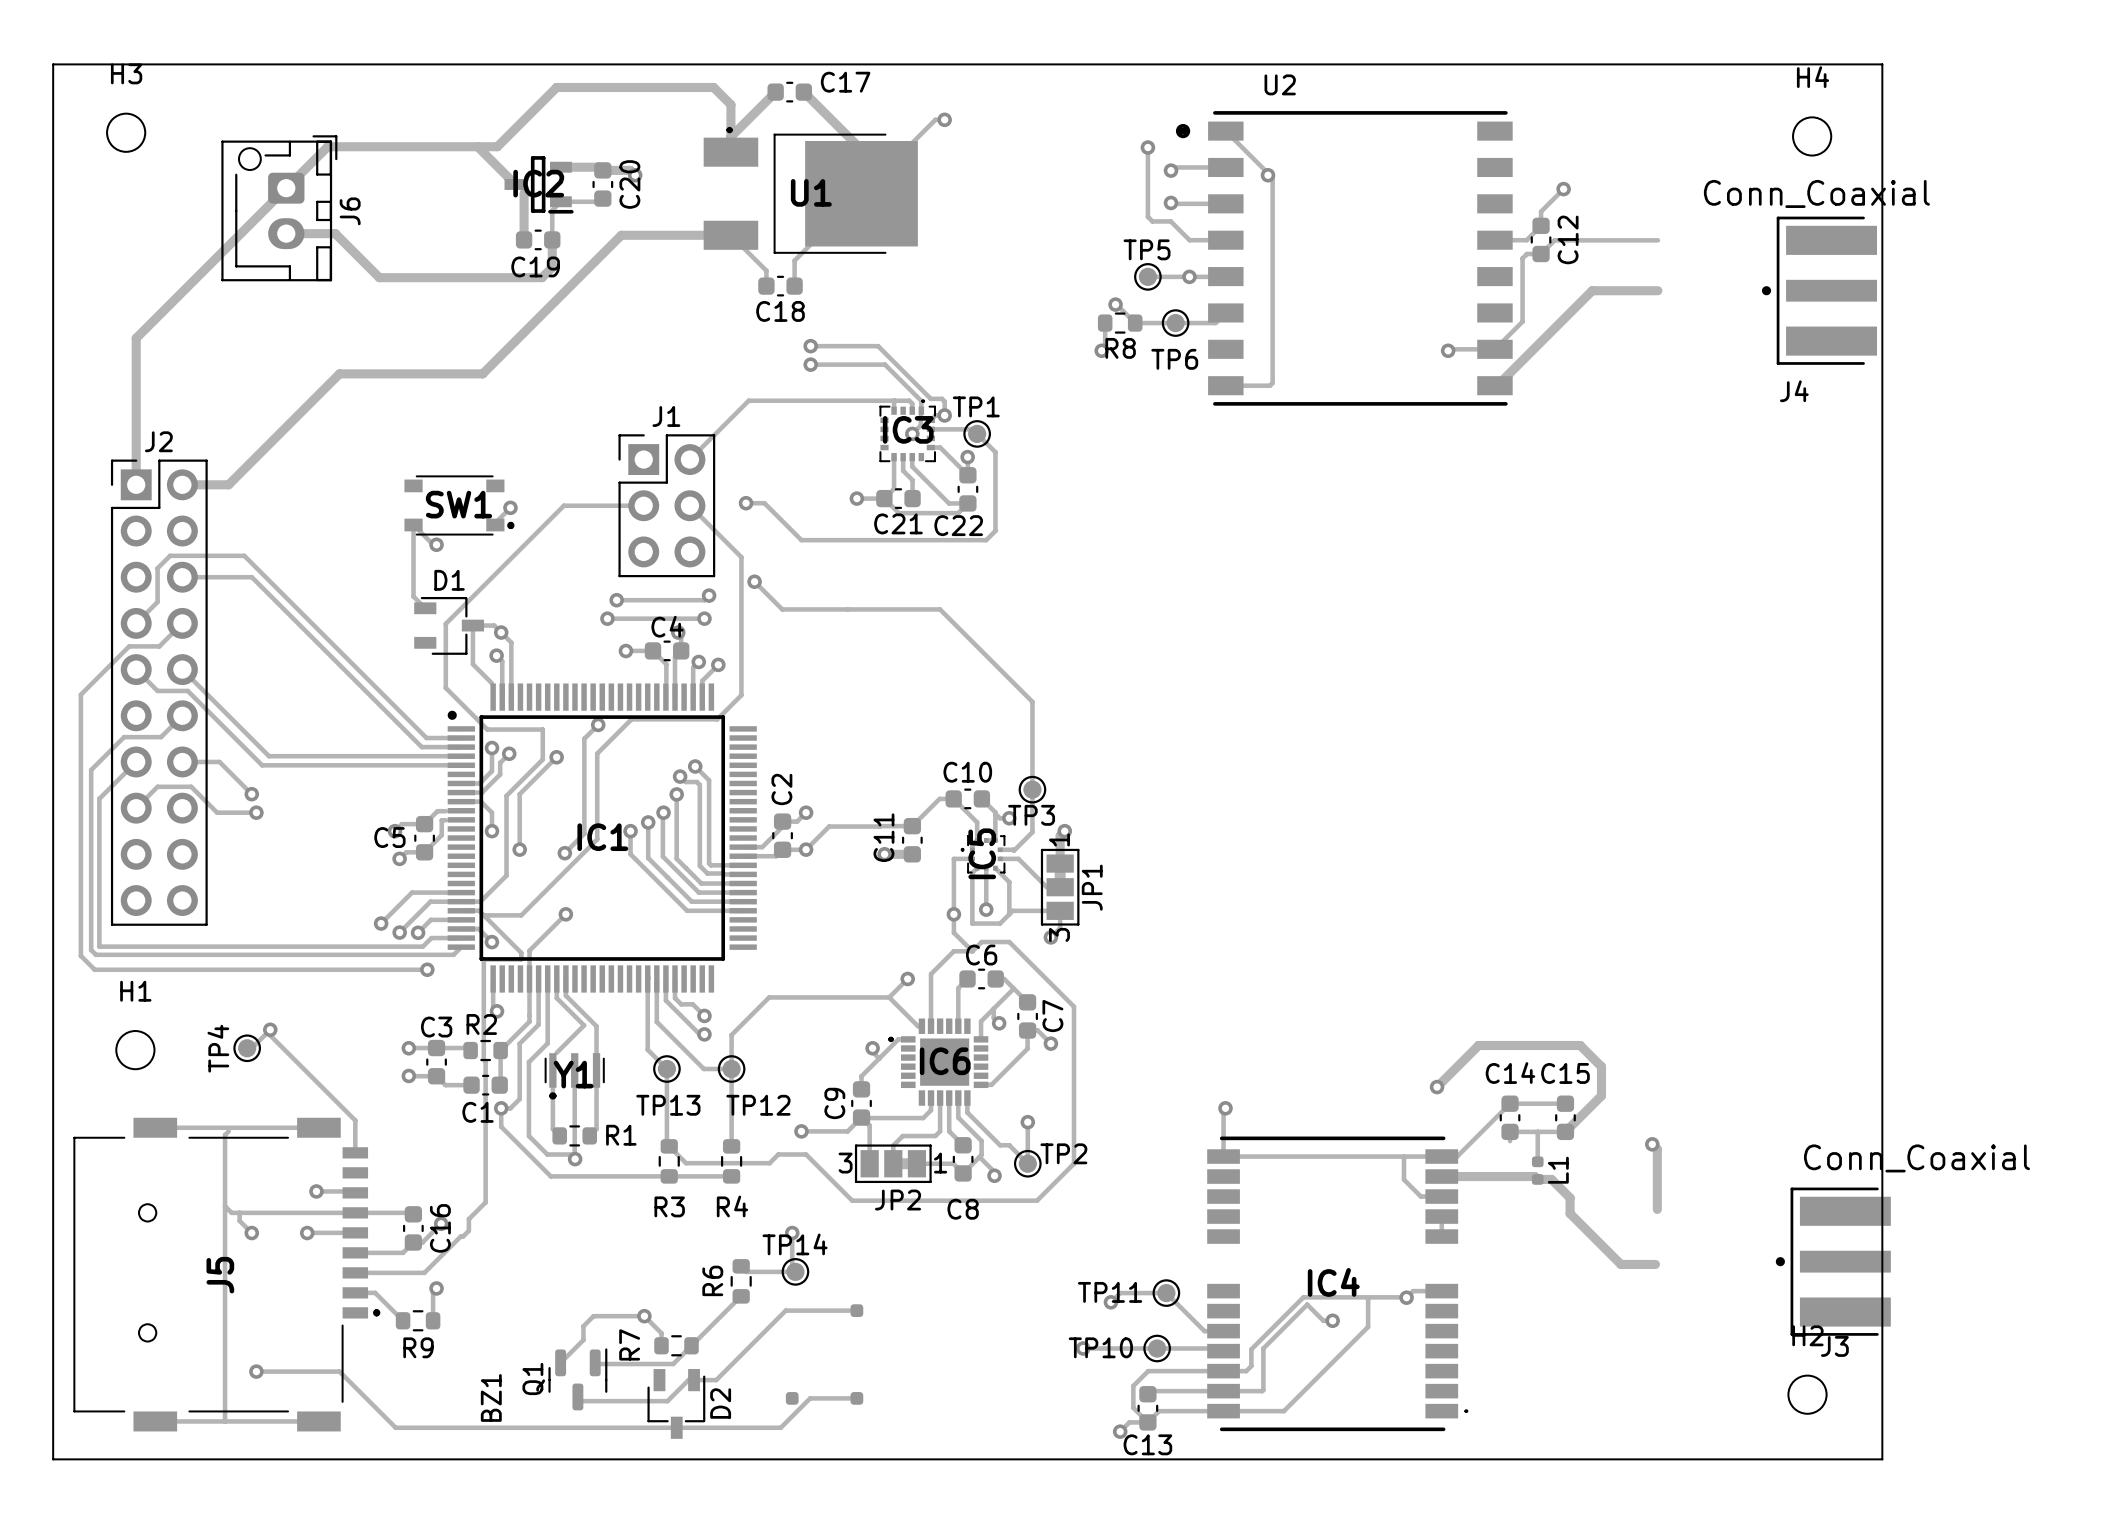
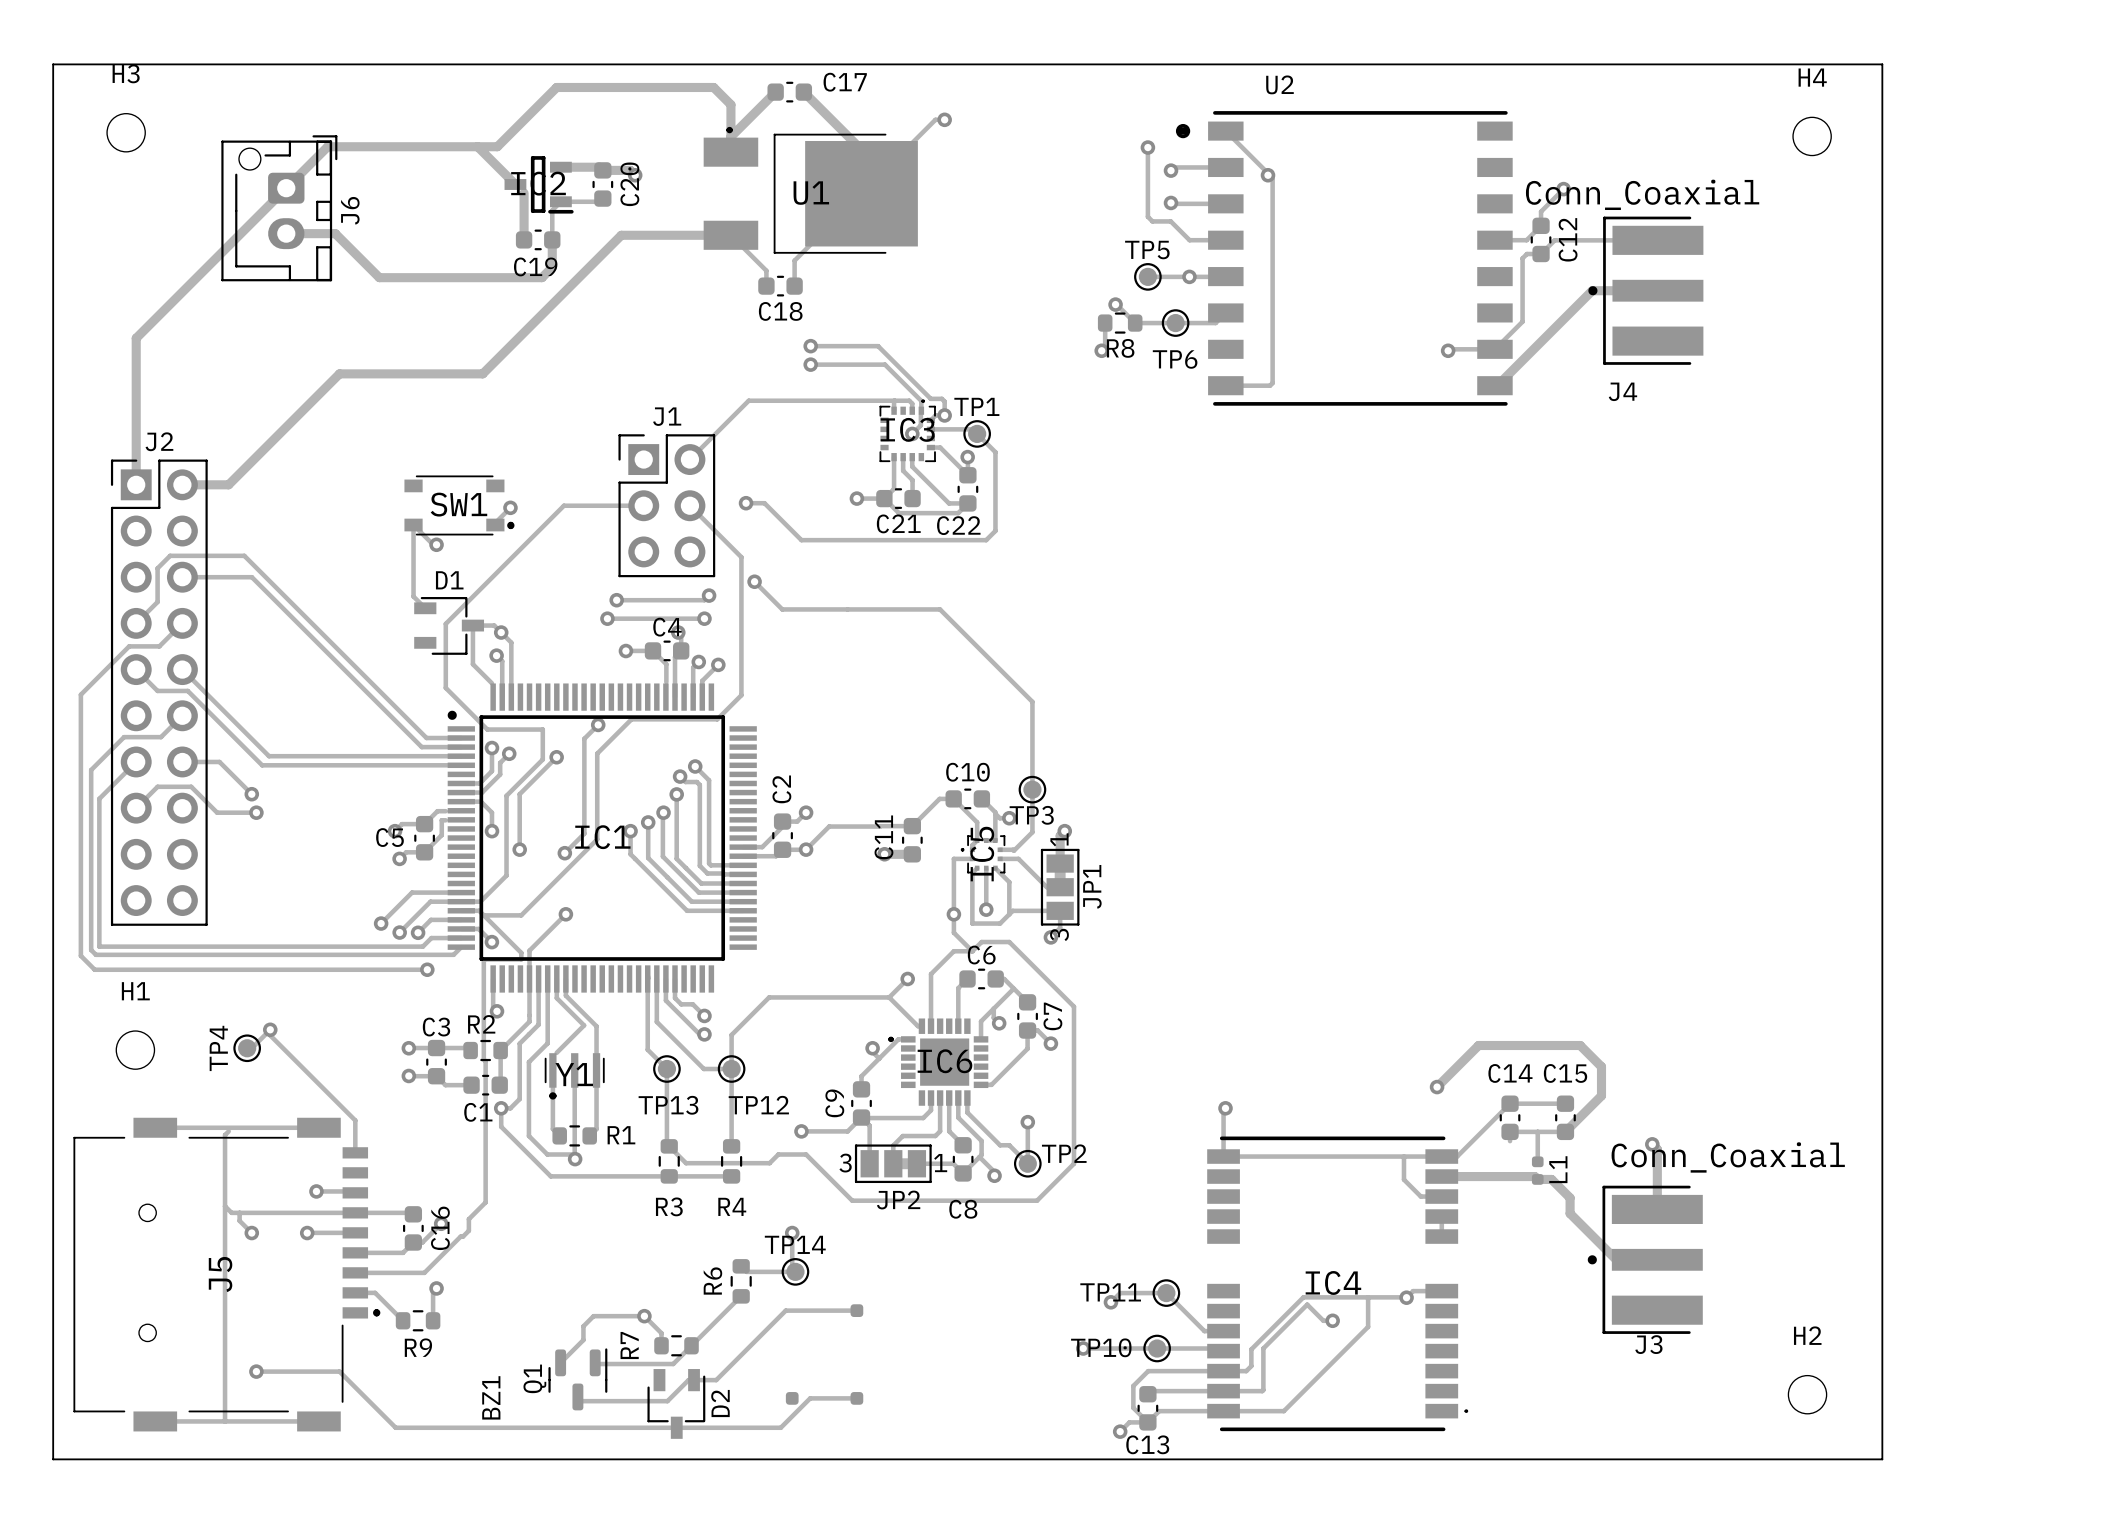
J4 position: (1819, 290) -> (1645, 290)
J3 position: (1833, 1261) -> (1645, 1259)

